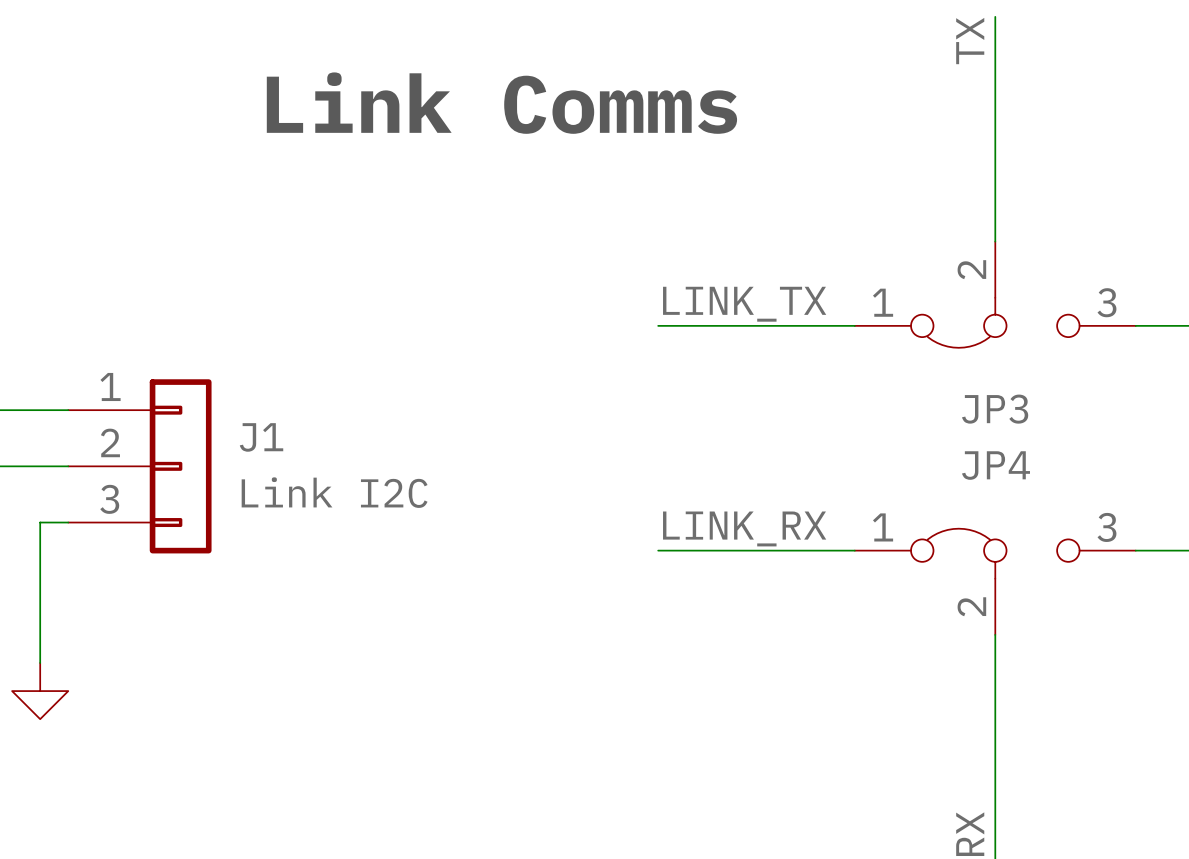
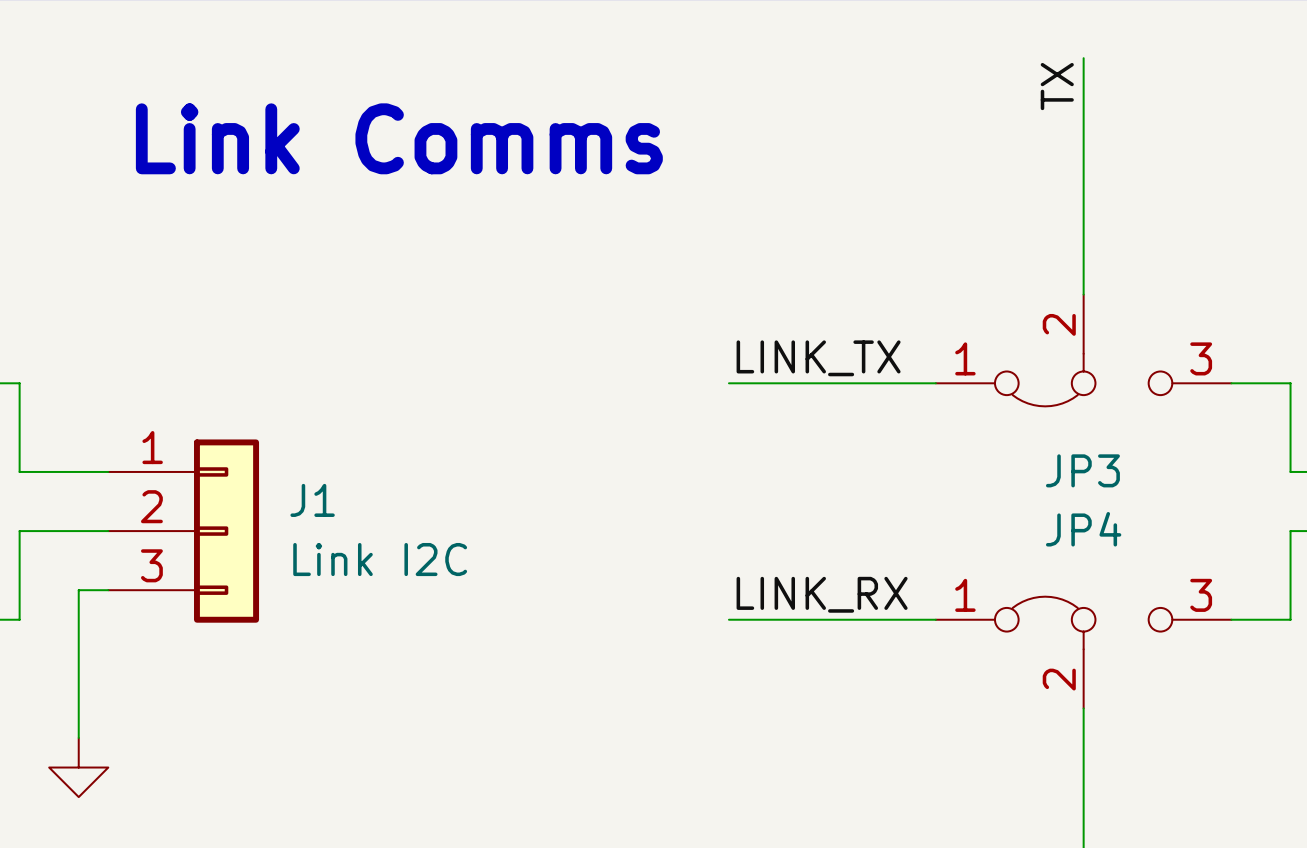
text position: Link Comms (501, 103) -> Link Comms (399, 138)

